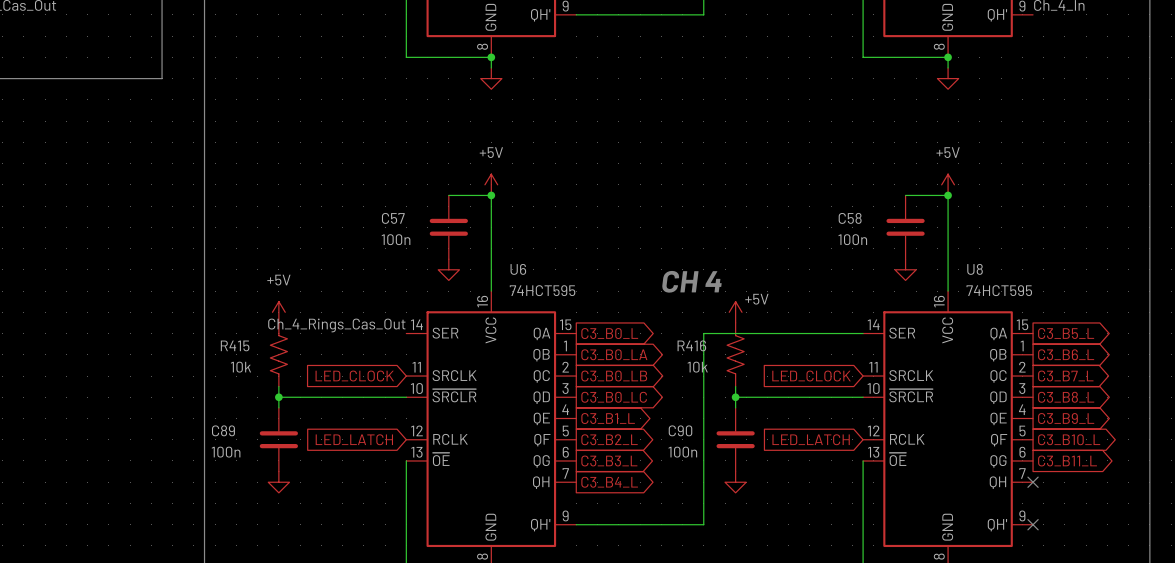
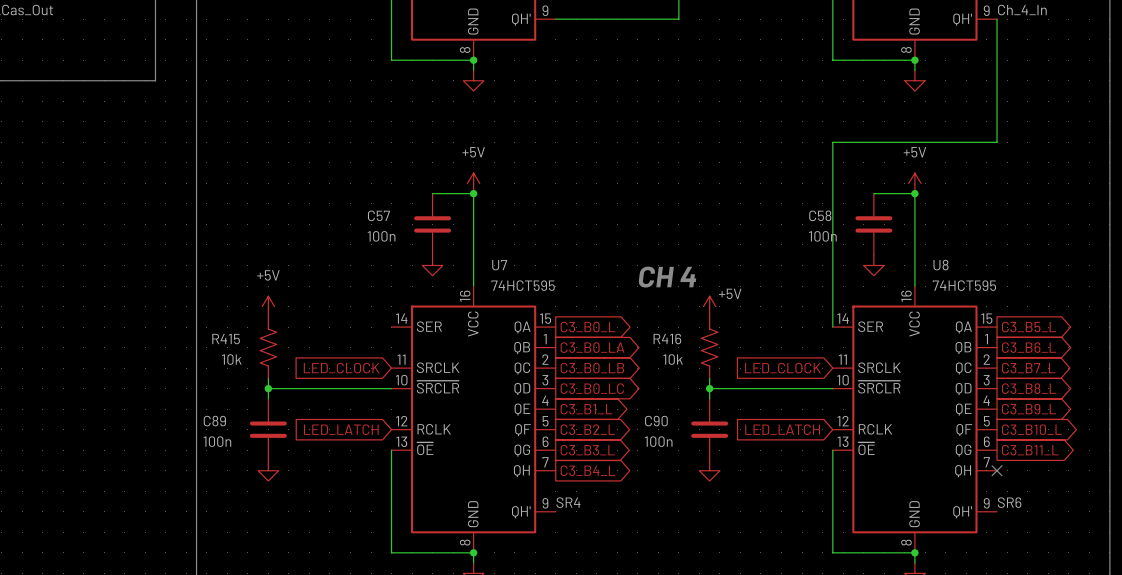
U6 name: U6 (518, 269) -> U7 (499, 265)
label: Ch_4_Rings_Cas_Out (336, 325) -> none
wire: (863, 333) (703, 333) (703, 524) (576, 524) -> (832, 327) (832, 142) (997, 142) (997, 19)
label: none -> SR4 (568, 502)
label: none -> SR6 (1009, 502)
no-connect mark: (1033, 524) -> none

